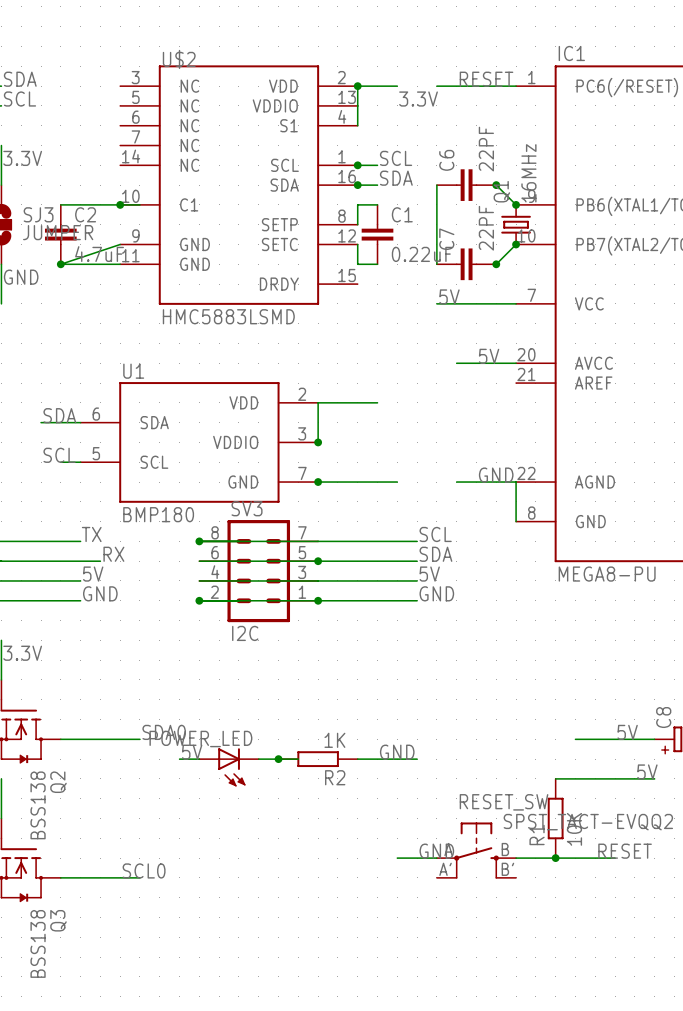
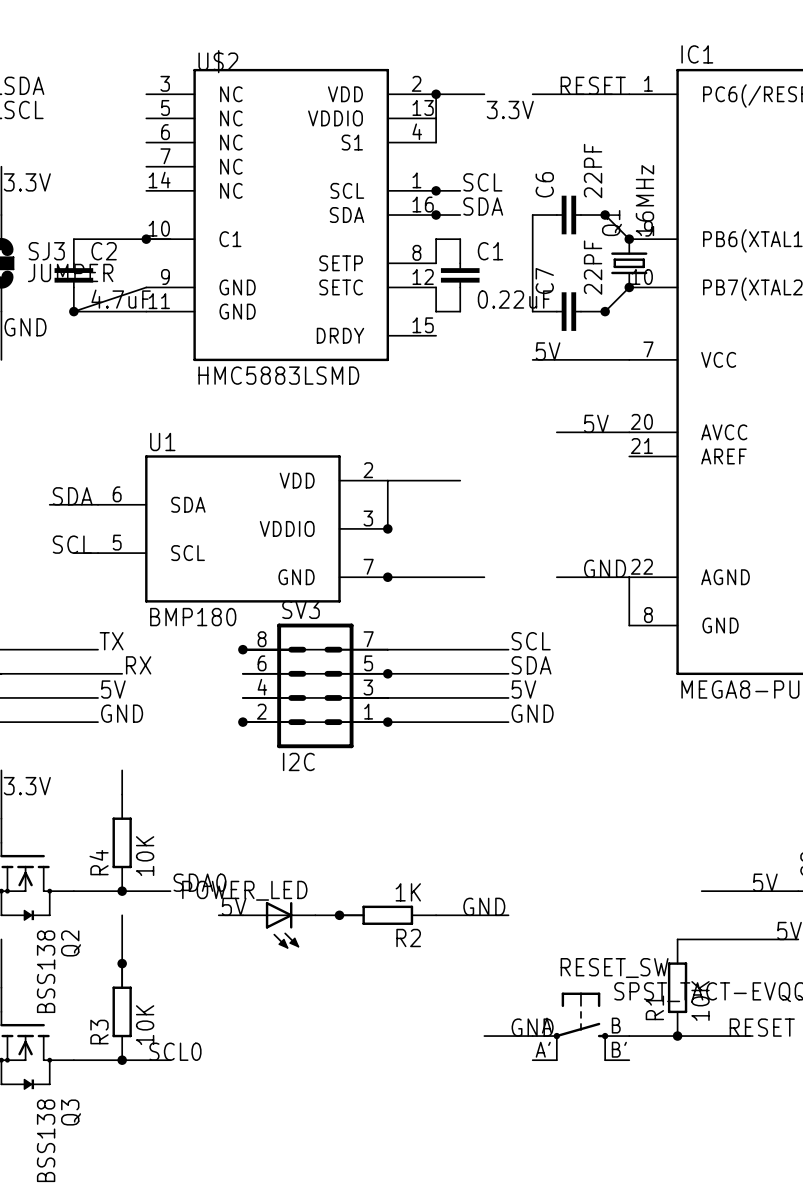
wire: none -> (122, 770) (122, 794)
R4: none -> 10K (122, 842)
junction: none -> (122, 891)
wire: none -> (122, 915) (122, 987)
junction: none -> (122, 963)
R3: none -> 10K (122, 1011)
junction: none -> (122, 1060)

